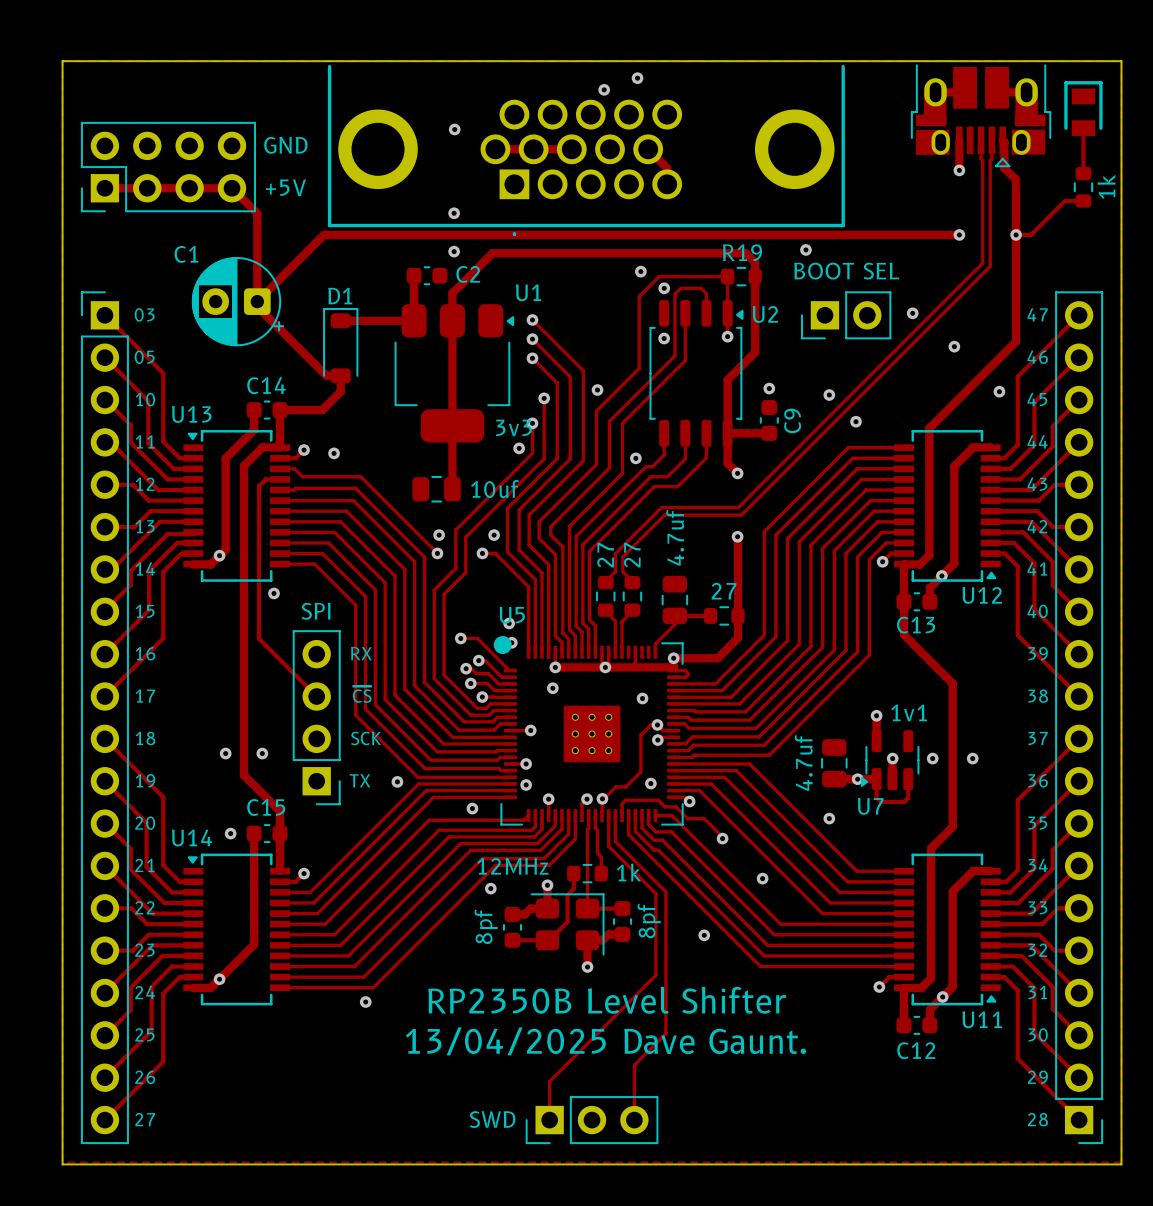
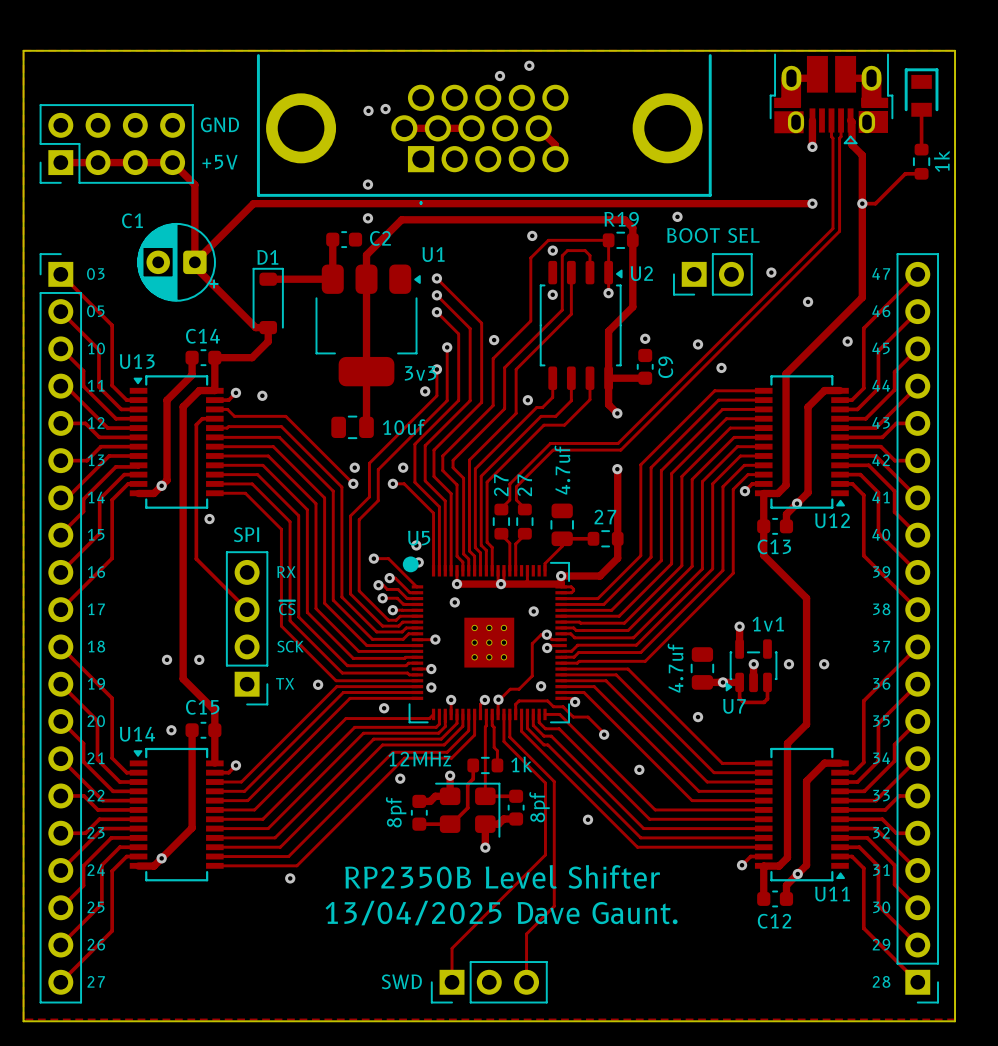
via: none -> (385, 109)
U7 footprint: [860, 730, 920, 791] -> [725, 639, 778, 693]

